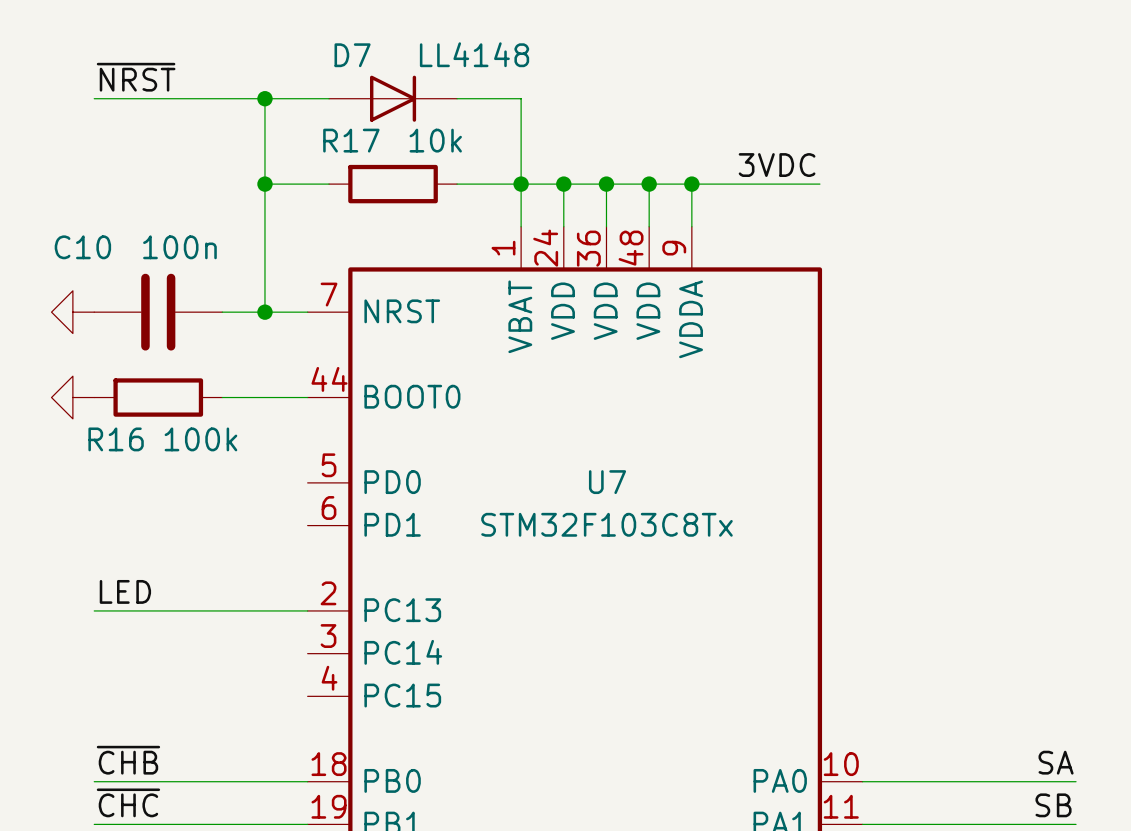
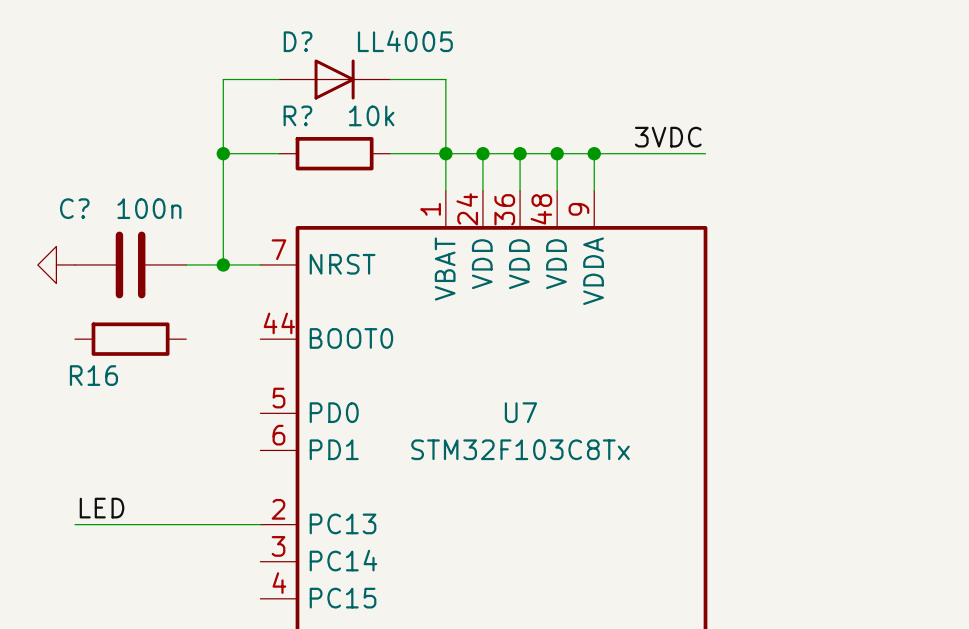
D7 value: LL4148 (474, 54) -> LL4005 (405, 41)
D7 name: D7 (352, 55) -> D? (298, 41)
label: ~{NRST} (136, 77) -> none
wire: (94, 98) (264, 98) -> none
junction: (264, 98) -> none
R17 name: R17 (351, 140) -> R? (297, 115)
C10 name: C10 (82, 247) -> C? (74, 208)
power symbol: (72, 397) -> none
wire: (222, 397) (307, 397) -> none
R16 value: 100k (200, 439) -> none

